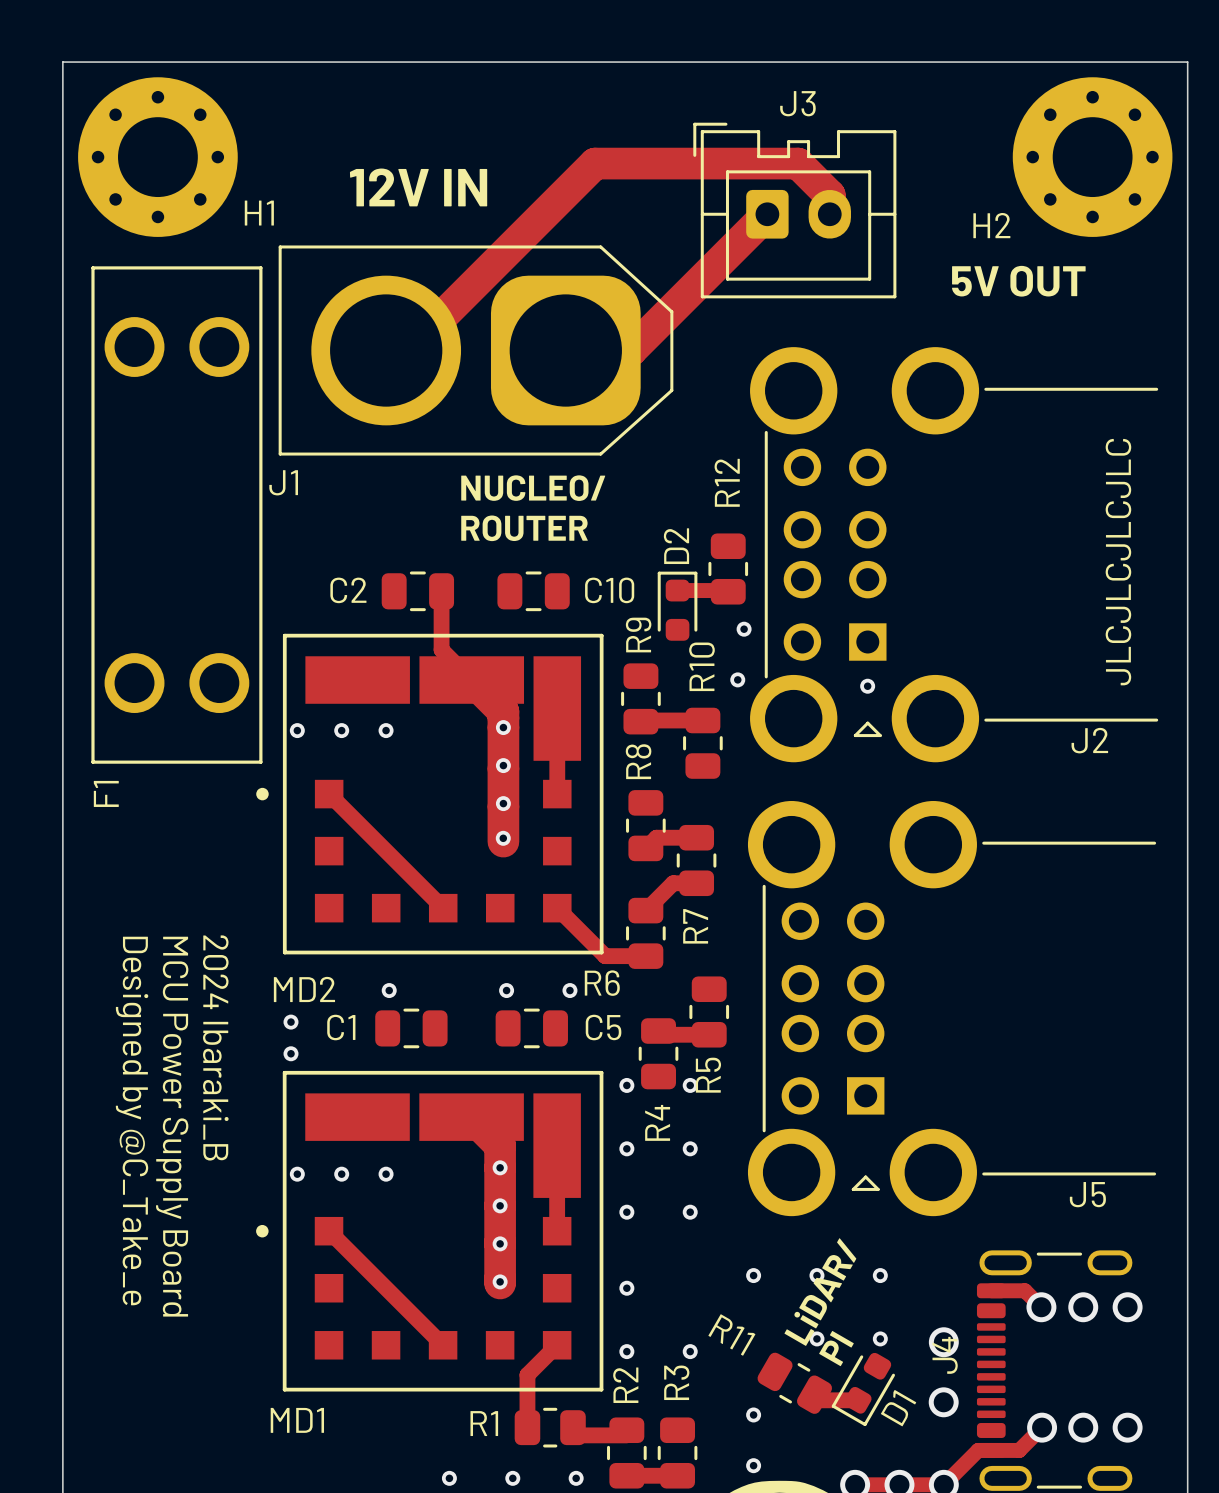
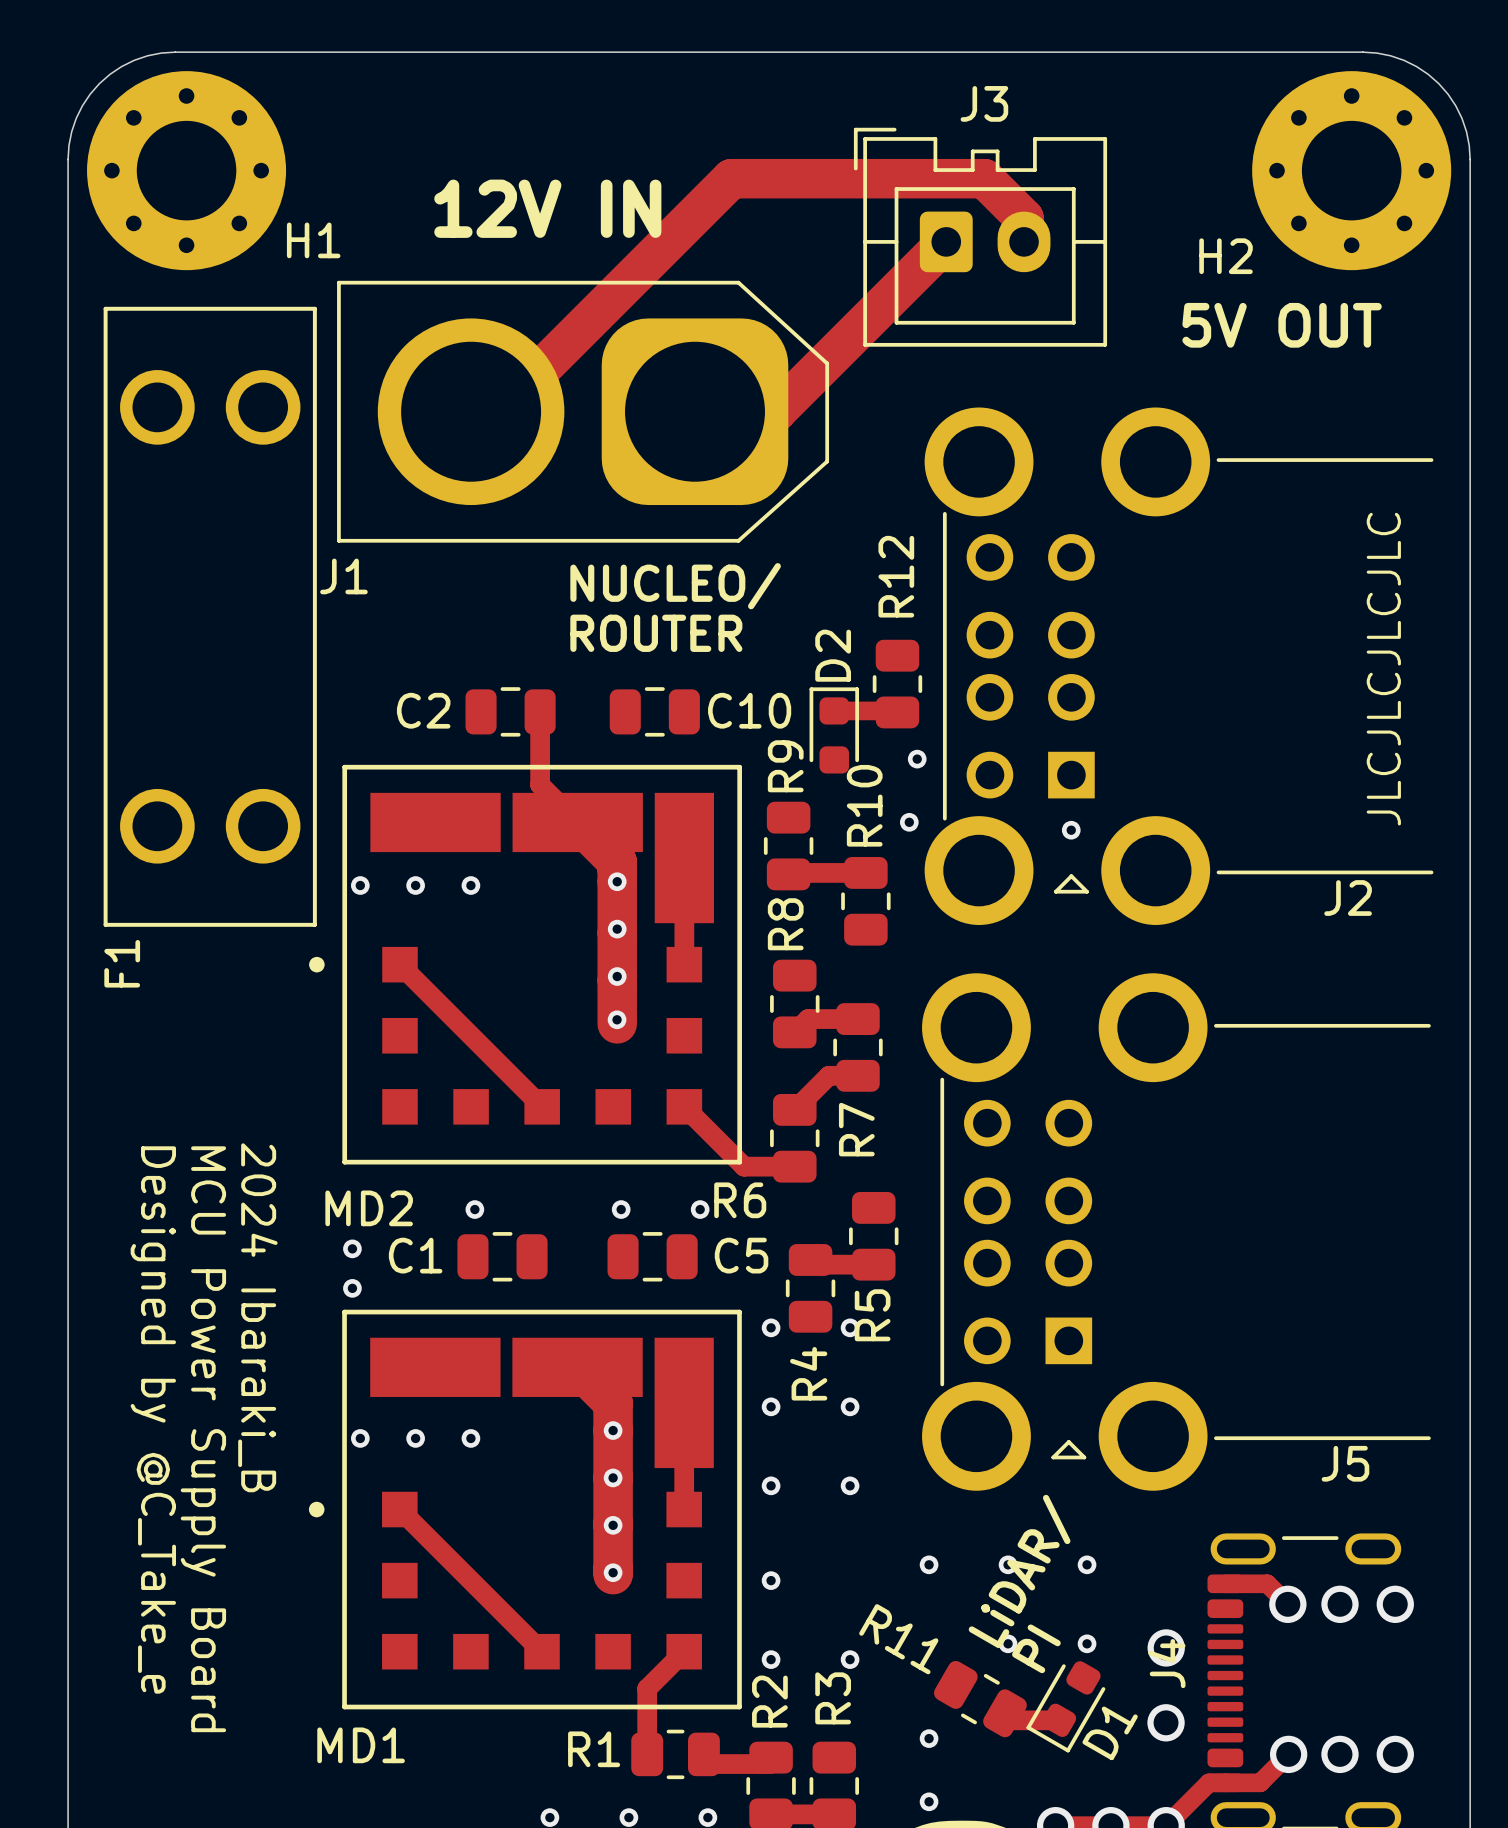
board edge: (148, 62) (62, 62) (62, 148) -> (175, 52) (161, 53) (134, 60) (121, 66) (99, 83) (90, 94) (76, 118) (68, 145) (68, 159)
board edge: (1101, 62) (1187, 62) (1187, 148) -> (1362, 52) (1390, 55) (1403, 60) (1428, 74) (1438, 83) (1455, 105) (1461, 118) (1466, 131) (1470, 159)

